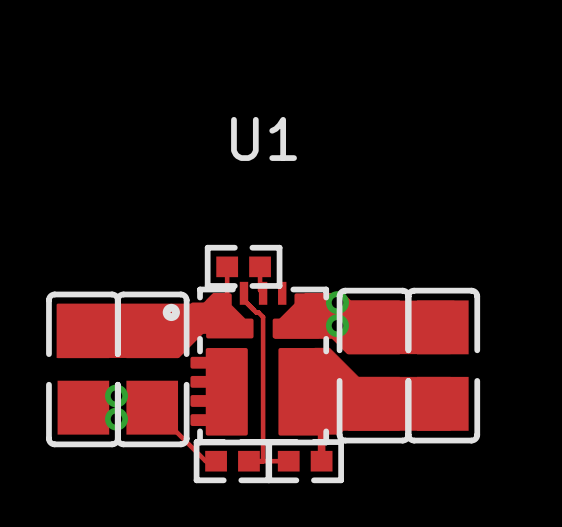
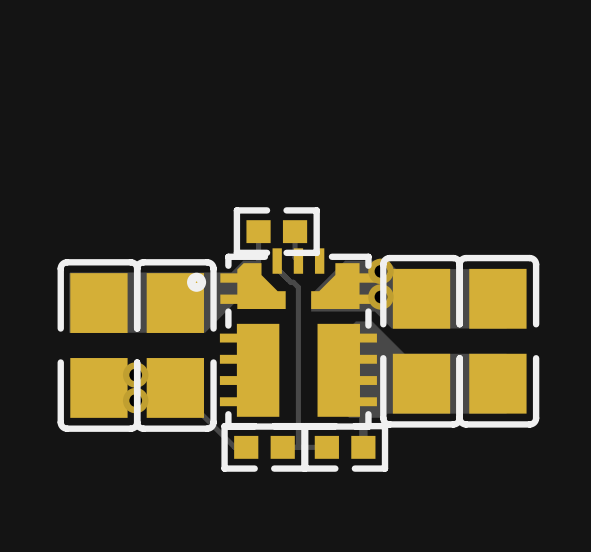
part: none -> (281, 339)
U1: (249, 363) -> none

